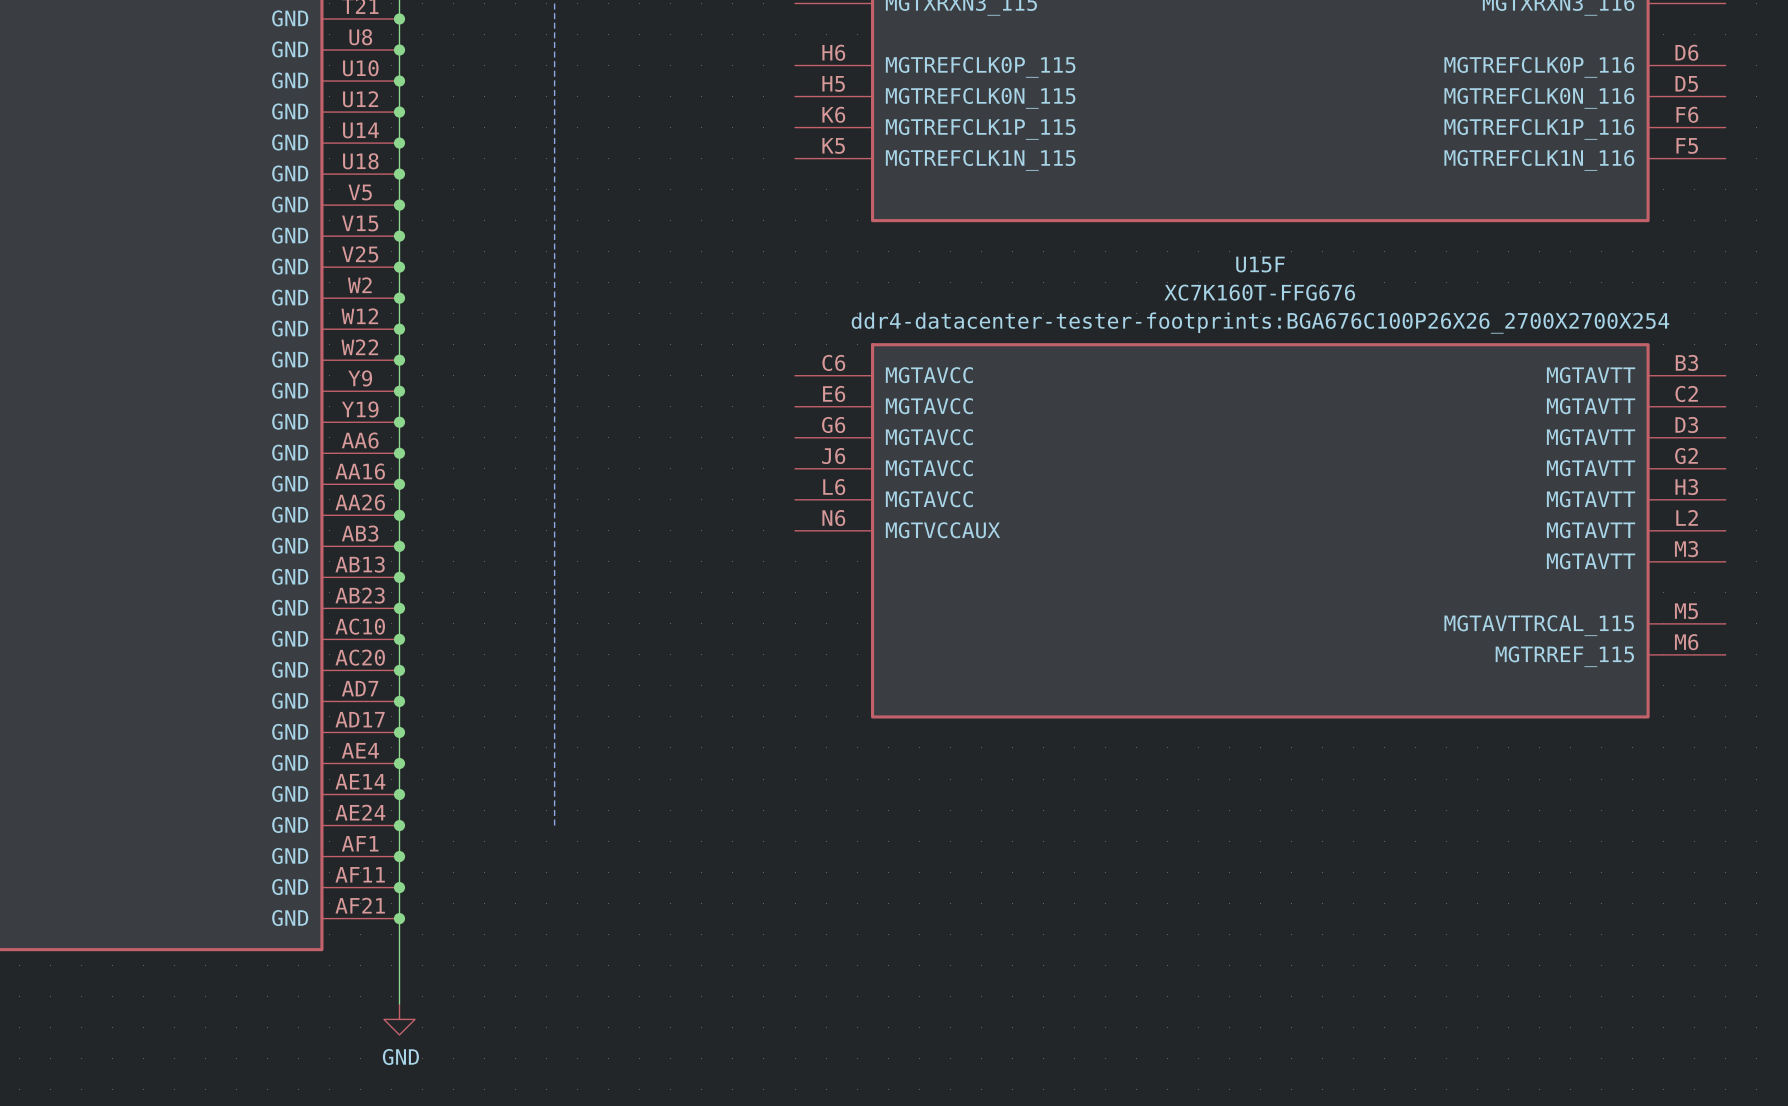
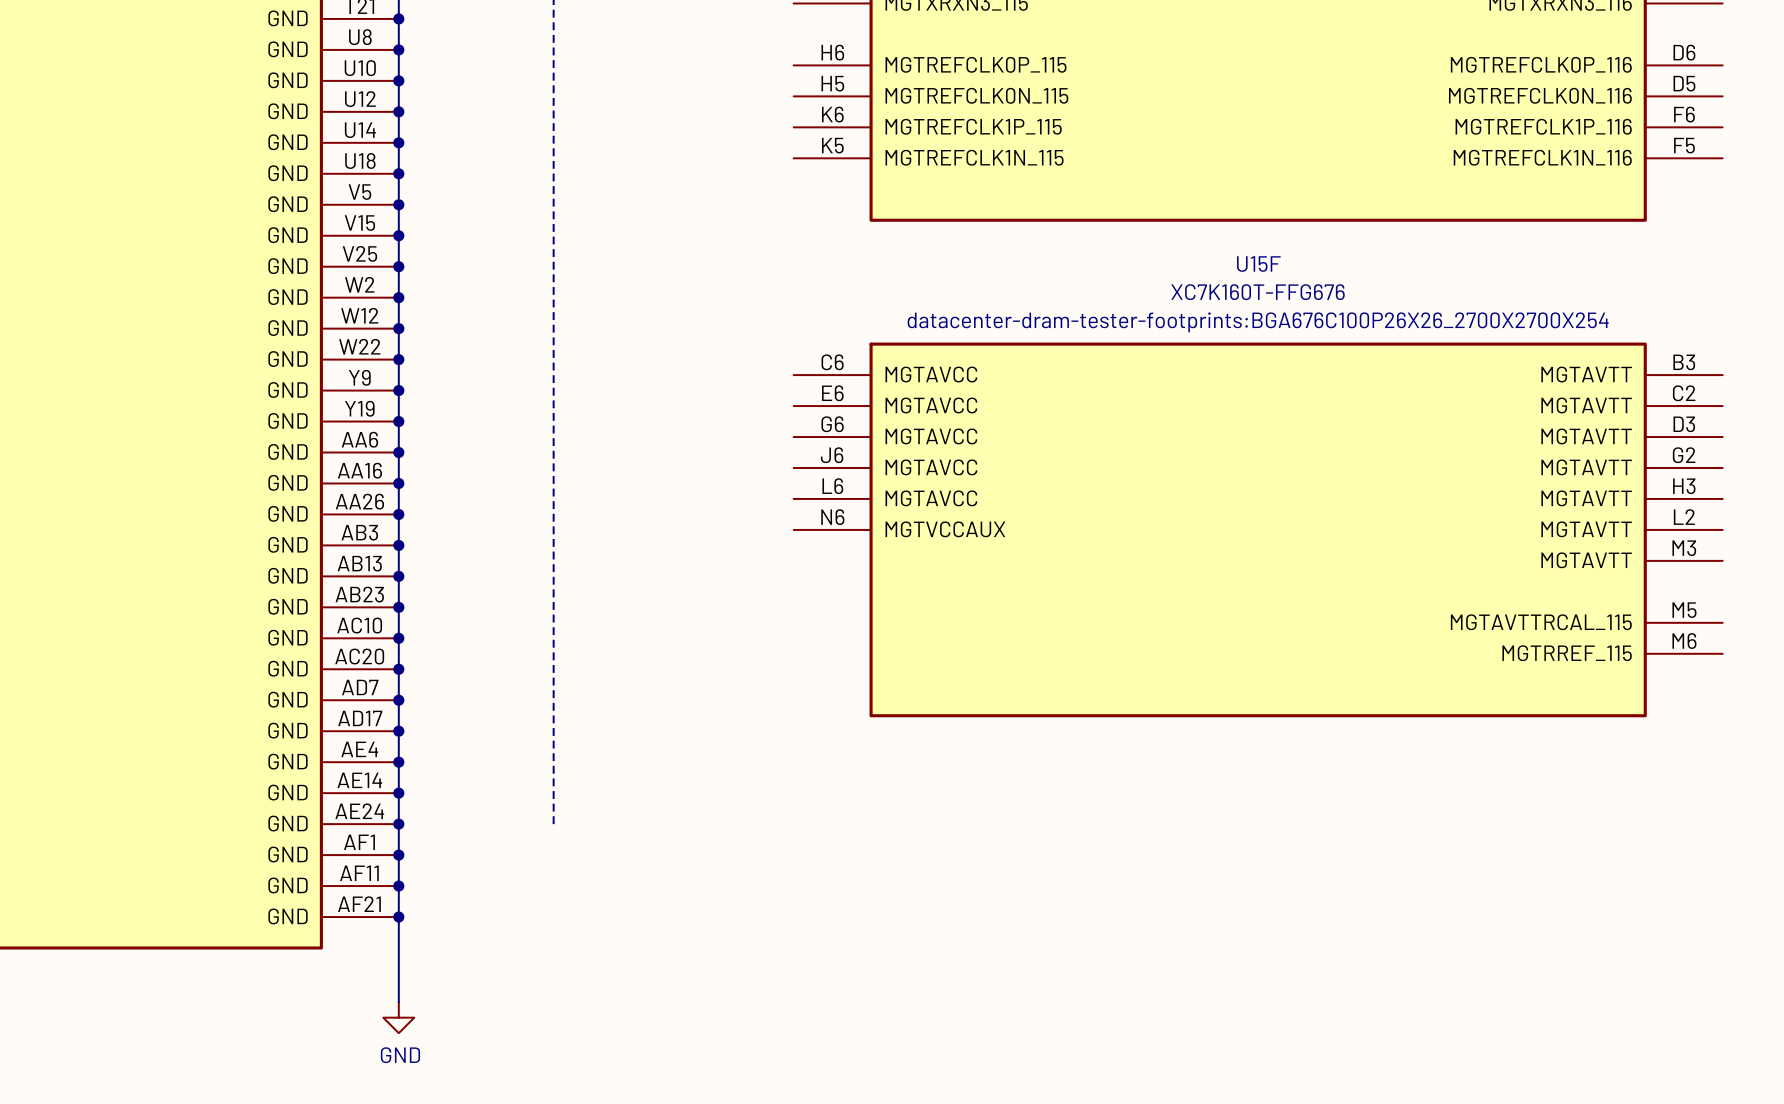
U15F text: ddr4-datacenter-tester-footprints:BGA676C100P26X26_2700X2700X254 (1260, 323) -> datacenter-dram-tester-footprints:BGA676C100P26X26_2700X2700X254 (1258, 322)

